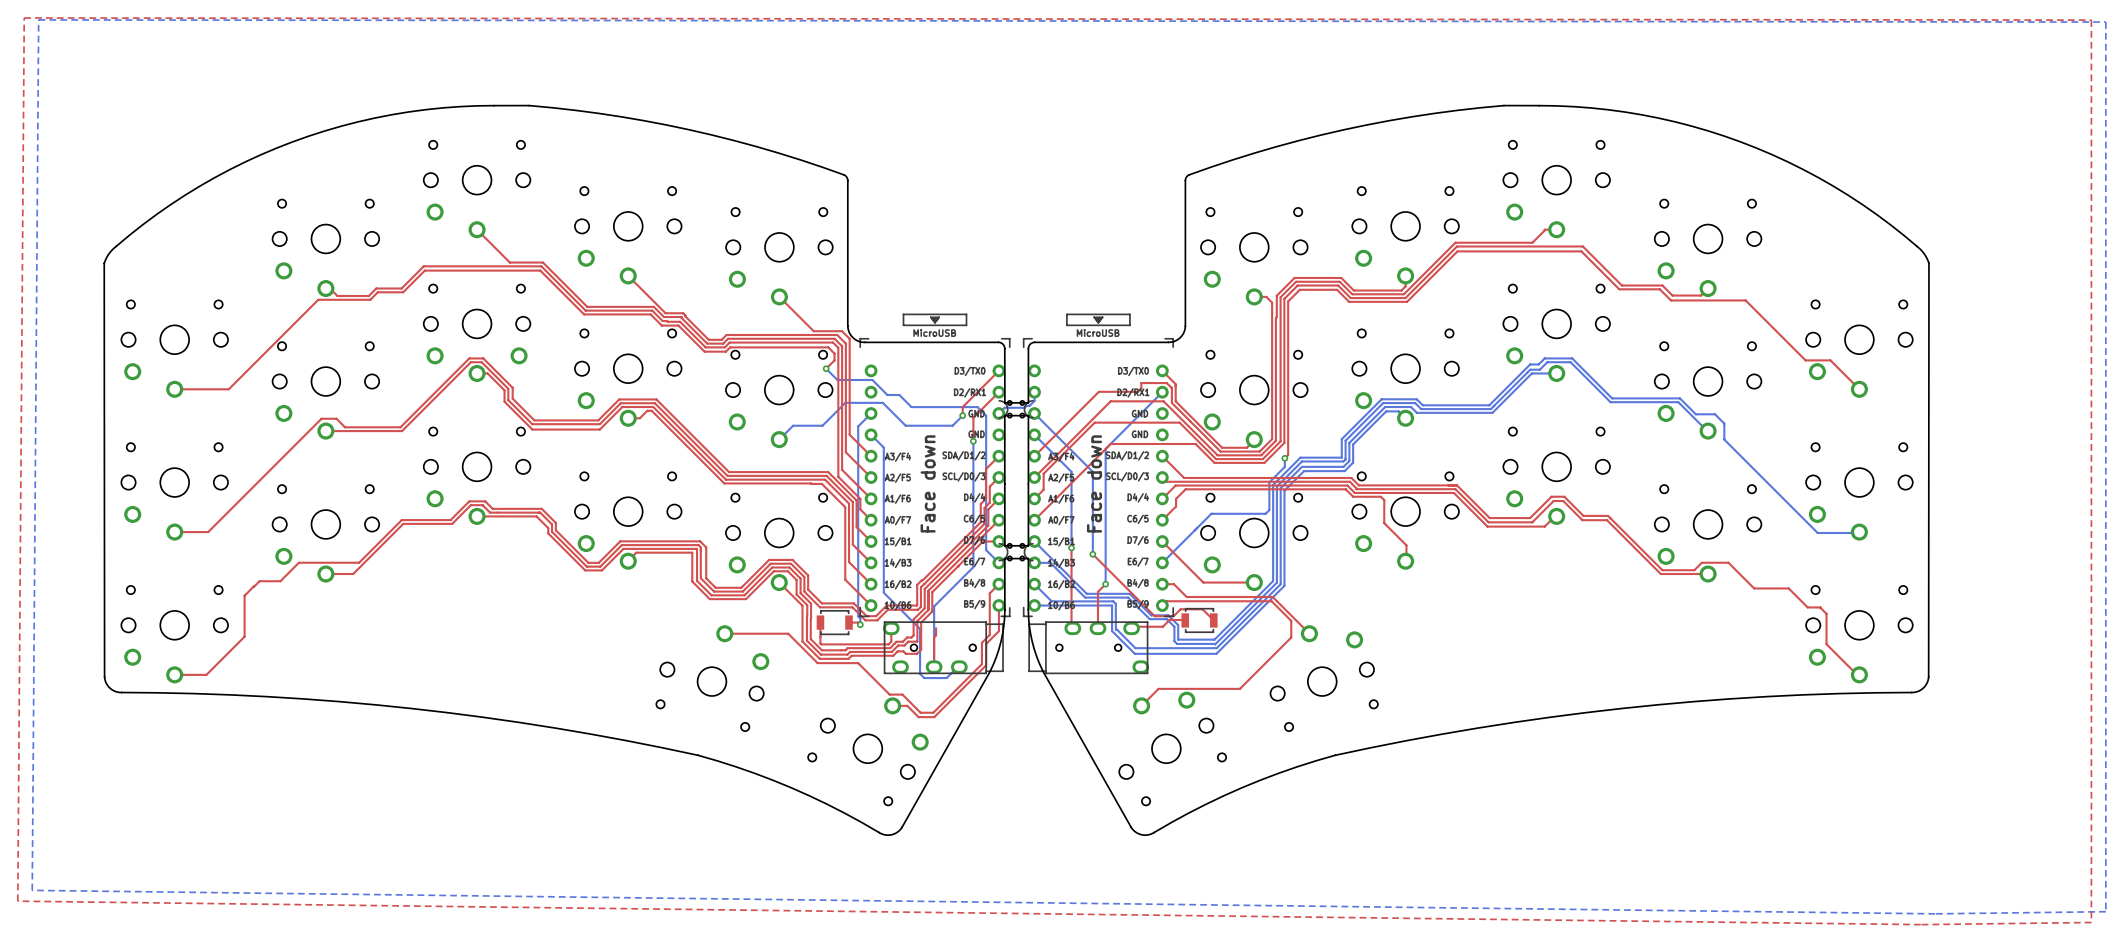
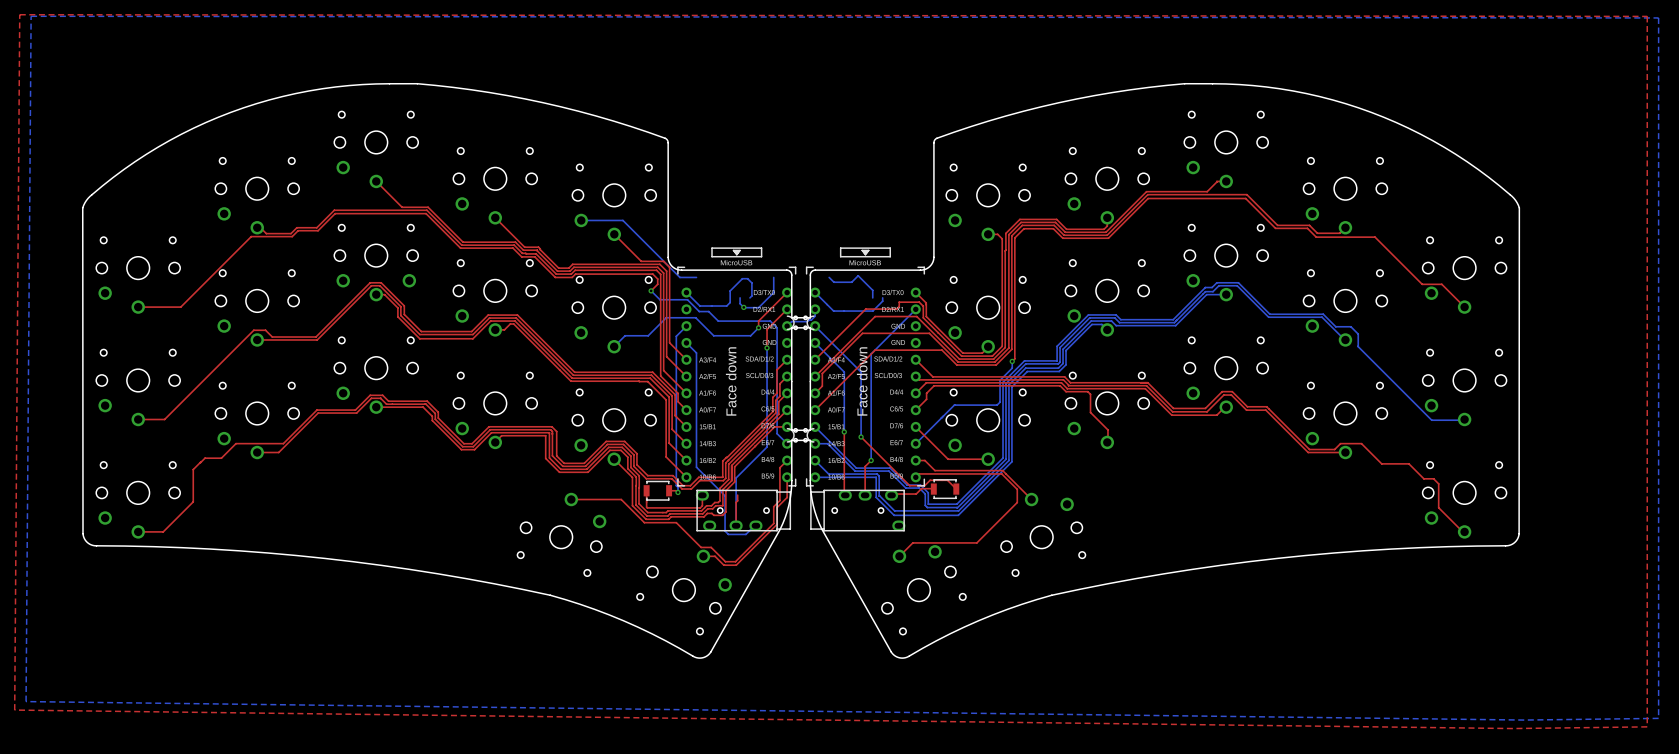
bottom track: none -> (581, 220) (622, 220) (679, 277) (696, 277)
bottom track: none -> (773, 277) (773, 292) (758, 307) (744, 307) (740, 303) (740, 297)
bottom track: none -> (829, 277) (833, 282) (851, 282) (858, 275) (872, 290) (872, 297)
bottom track: none -> (686, 292) (699, 306) (726, 306) (730, 302) (730, 290) (742, 278) (747, 278) (751, 282) (751, 295) (749, 297)
bottom track: none -> (815, 292) (833, 311) (872, 311) (882, 301) (882, 297)
via: none -> (743, 307)

